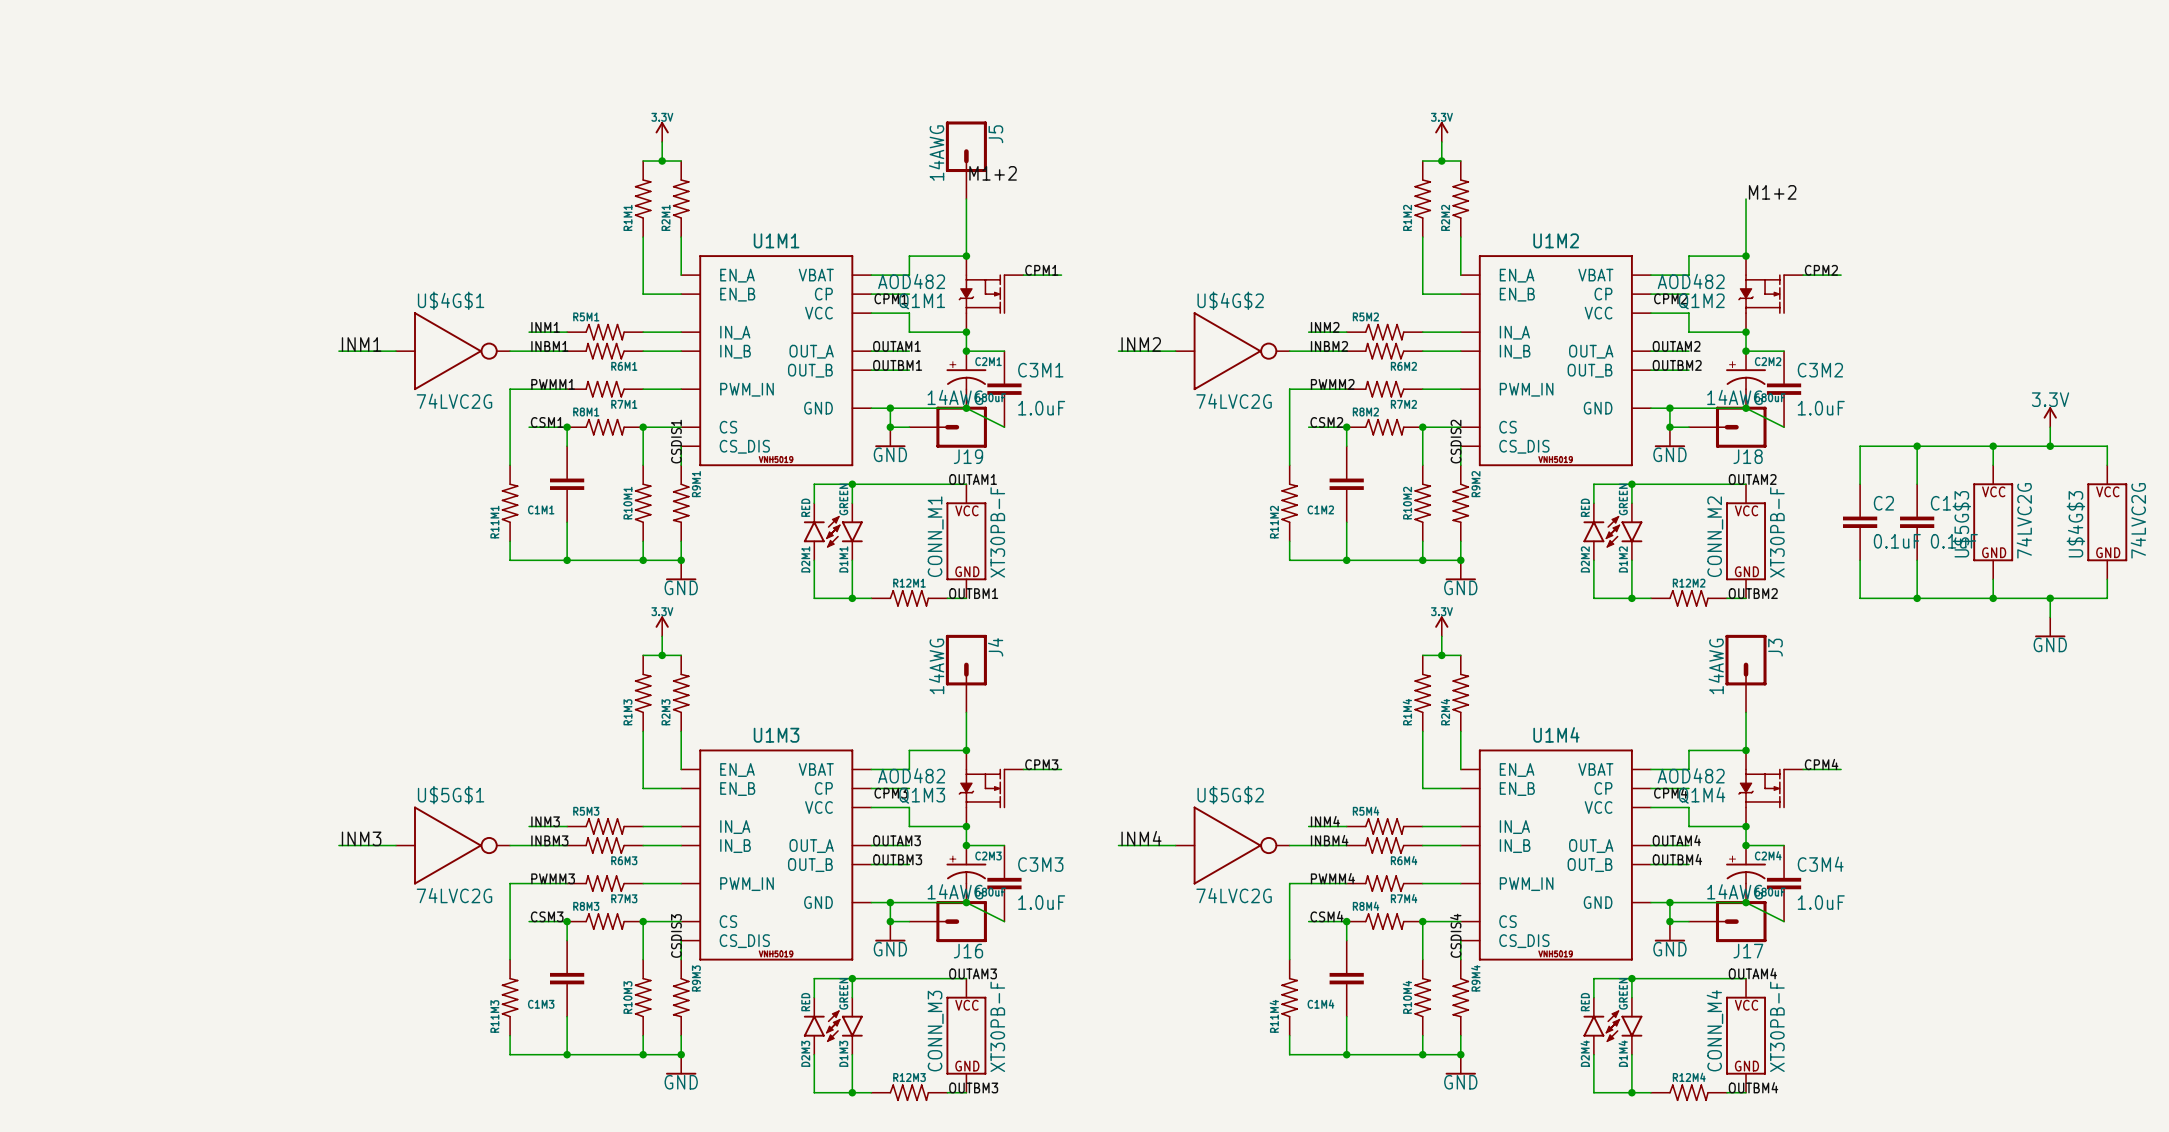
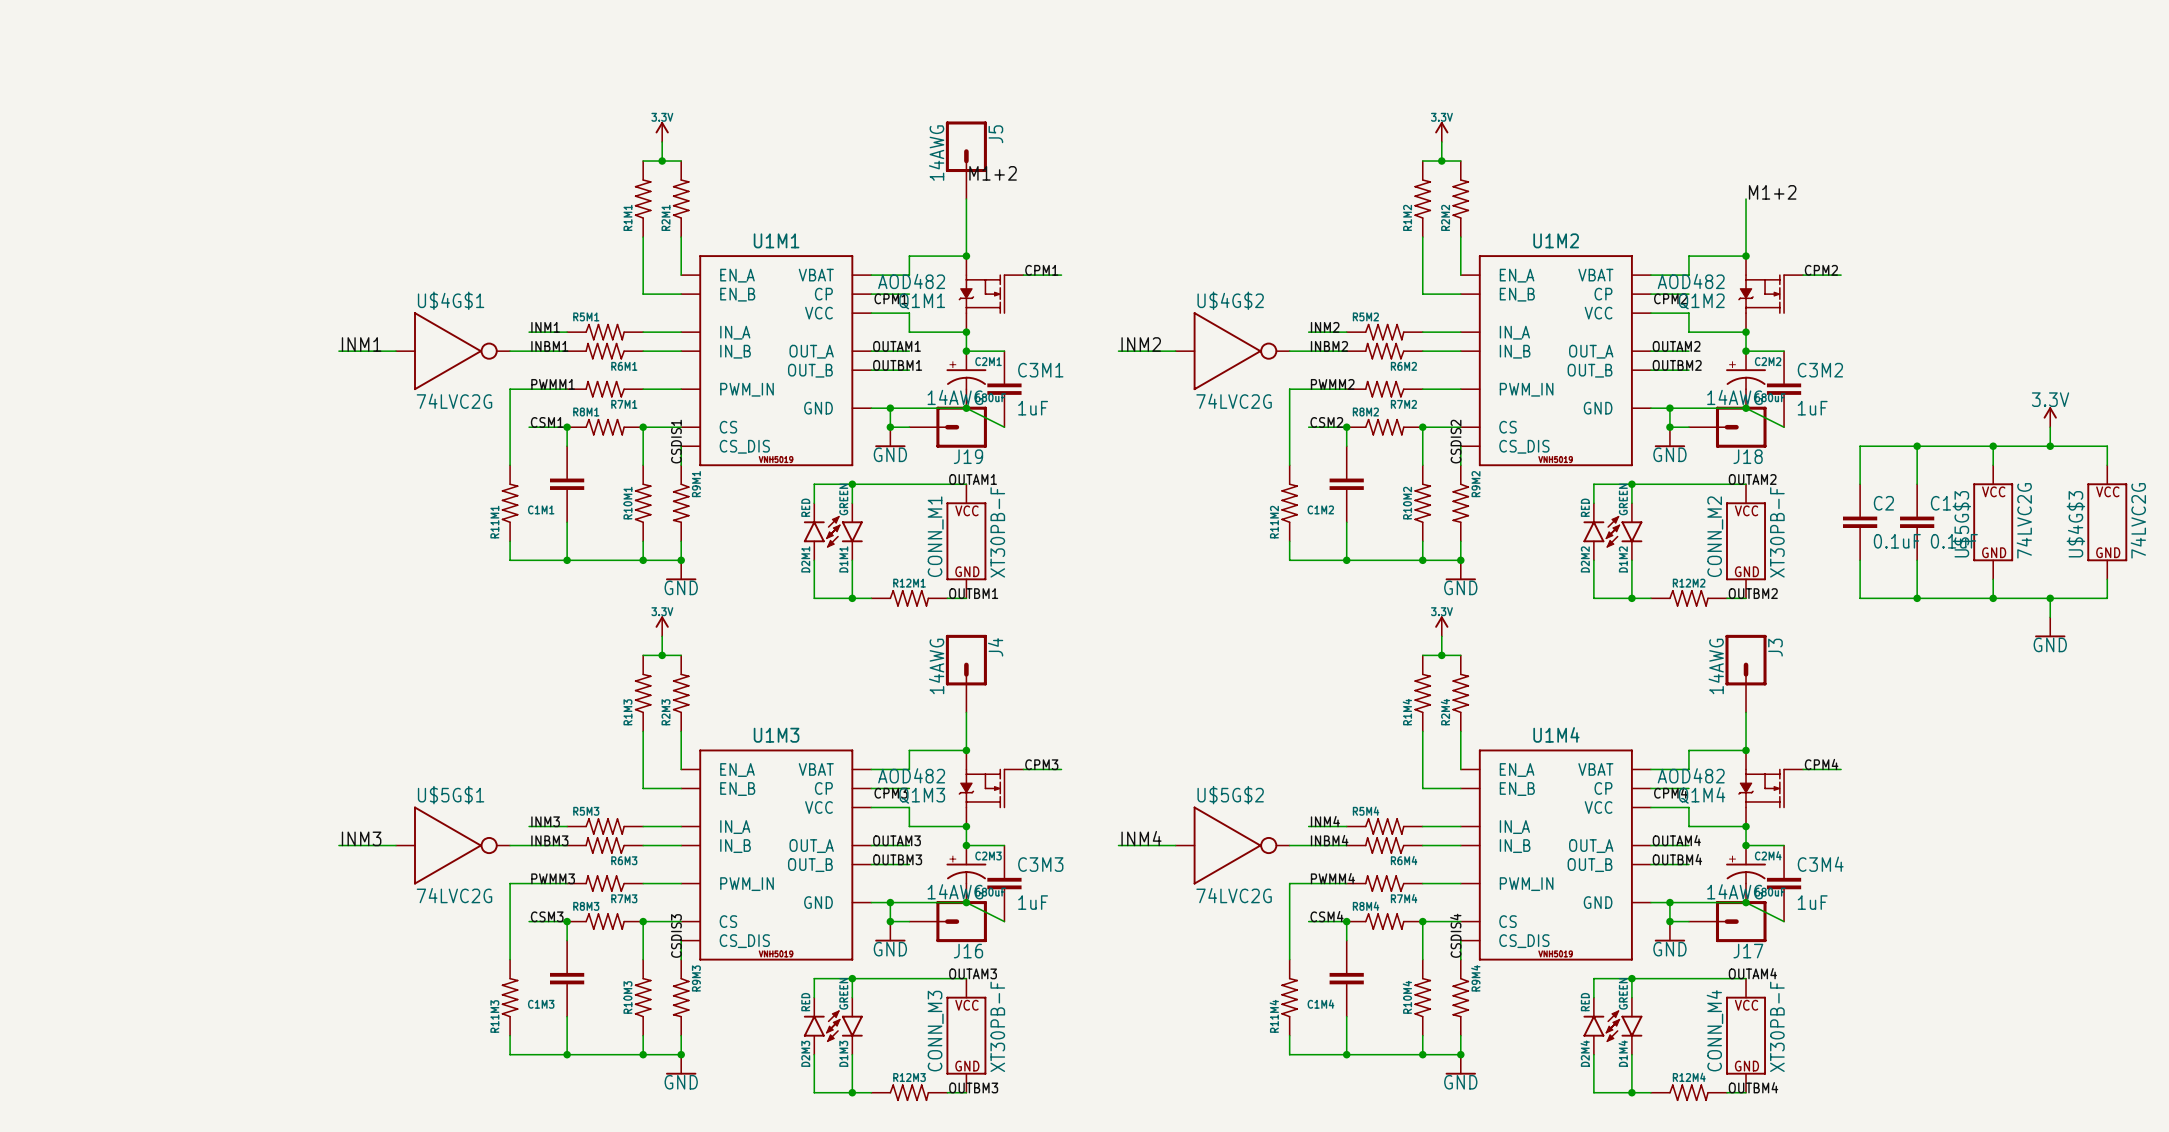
C3M1 value: 1.0uF (1041, 408) -> 1uF (1033, 408)
C3M2 value: 1.0uF (1821, 408) -> 1uF (1812, 408)
C3M3 value: 1.0uF (1041, 902) -> 1uF (1033, 902)
C3M4 value: 1.0uF (1821, 902) -> 1uF (1812, 902)

